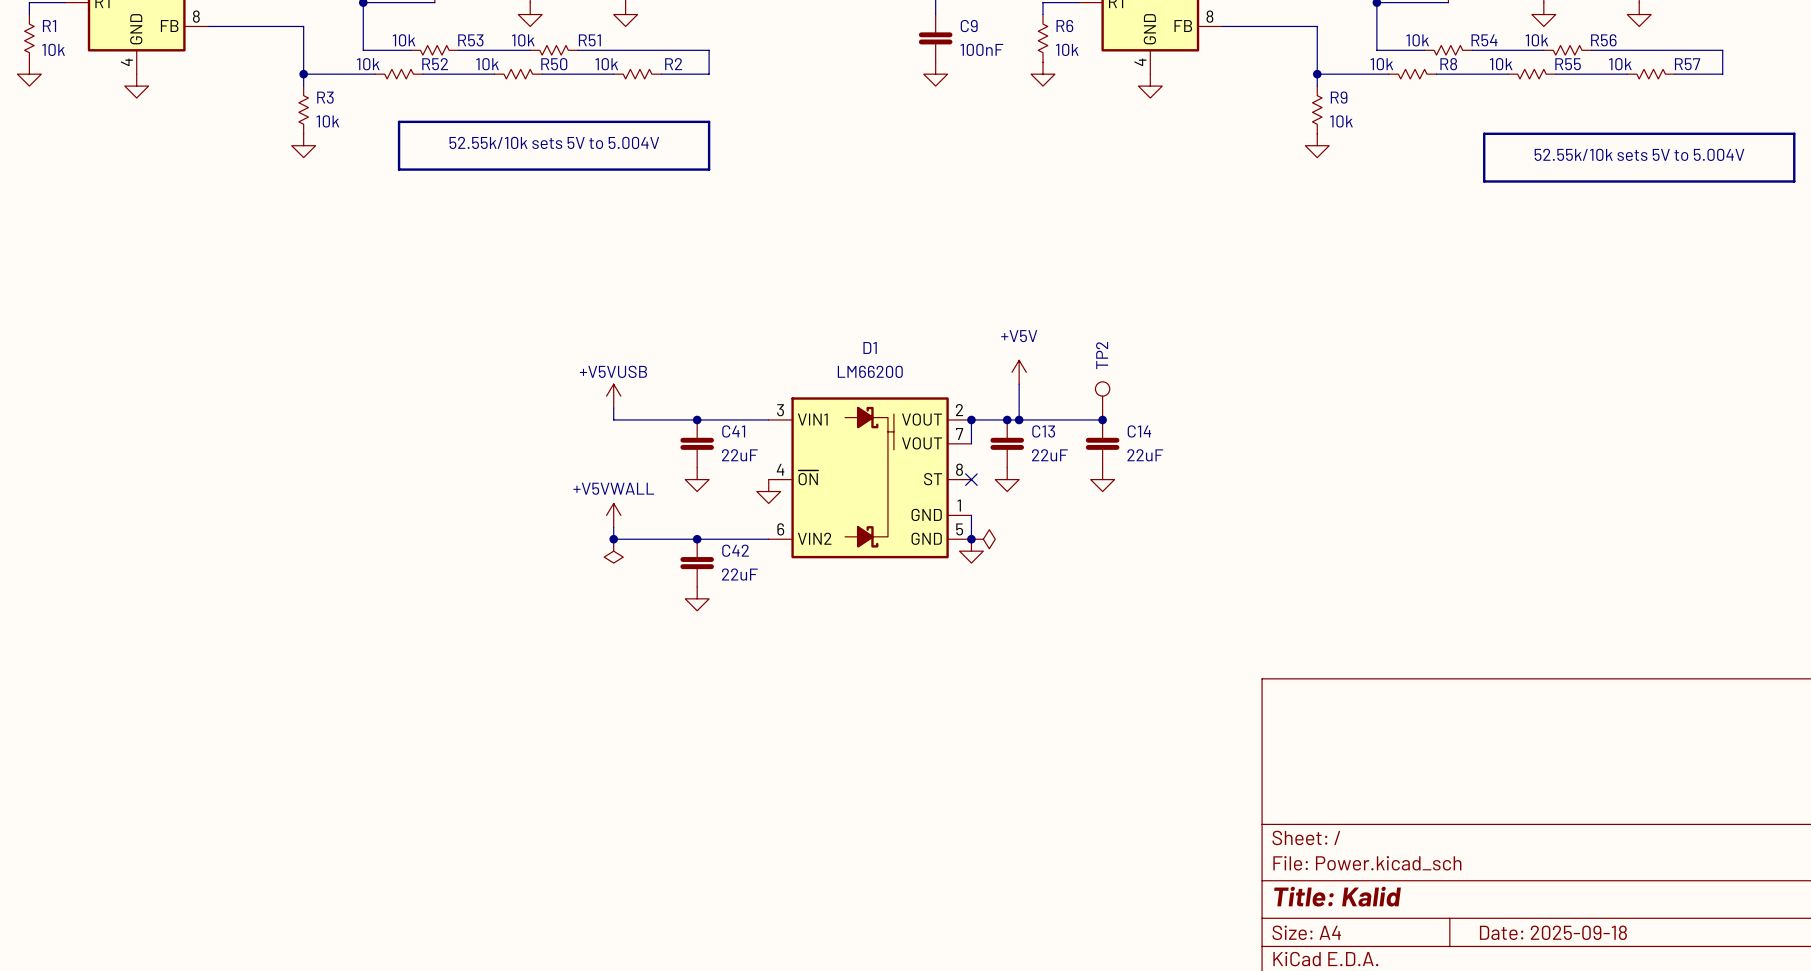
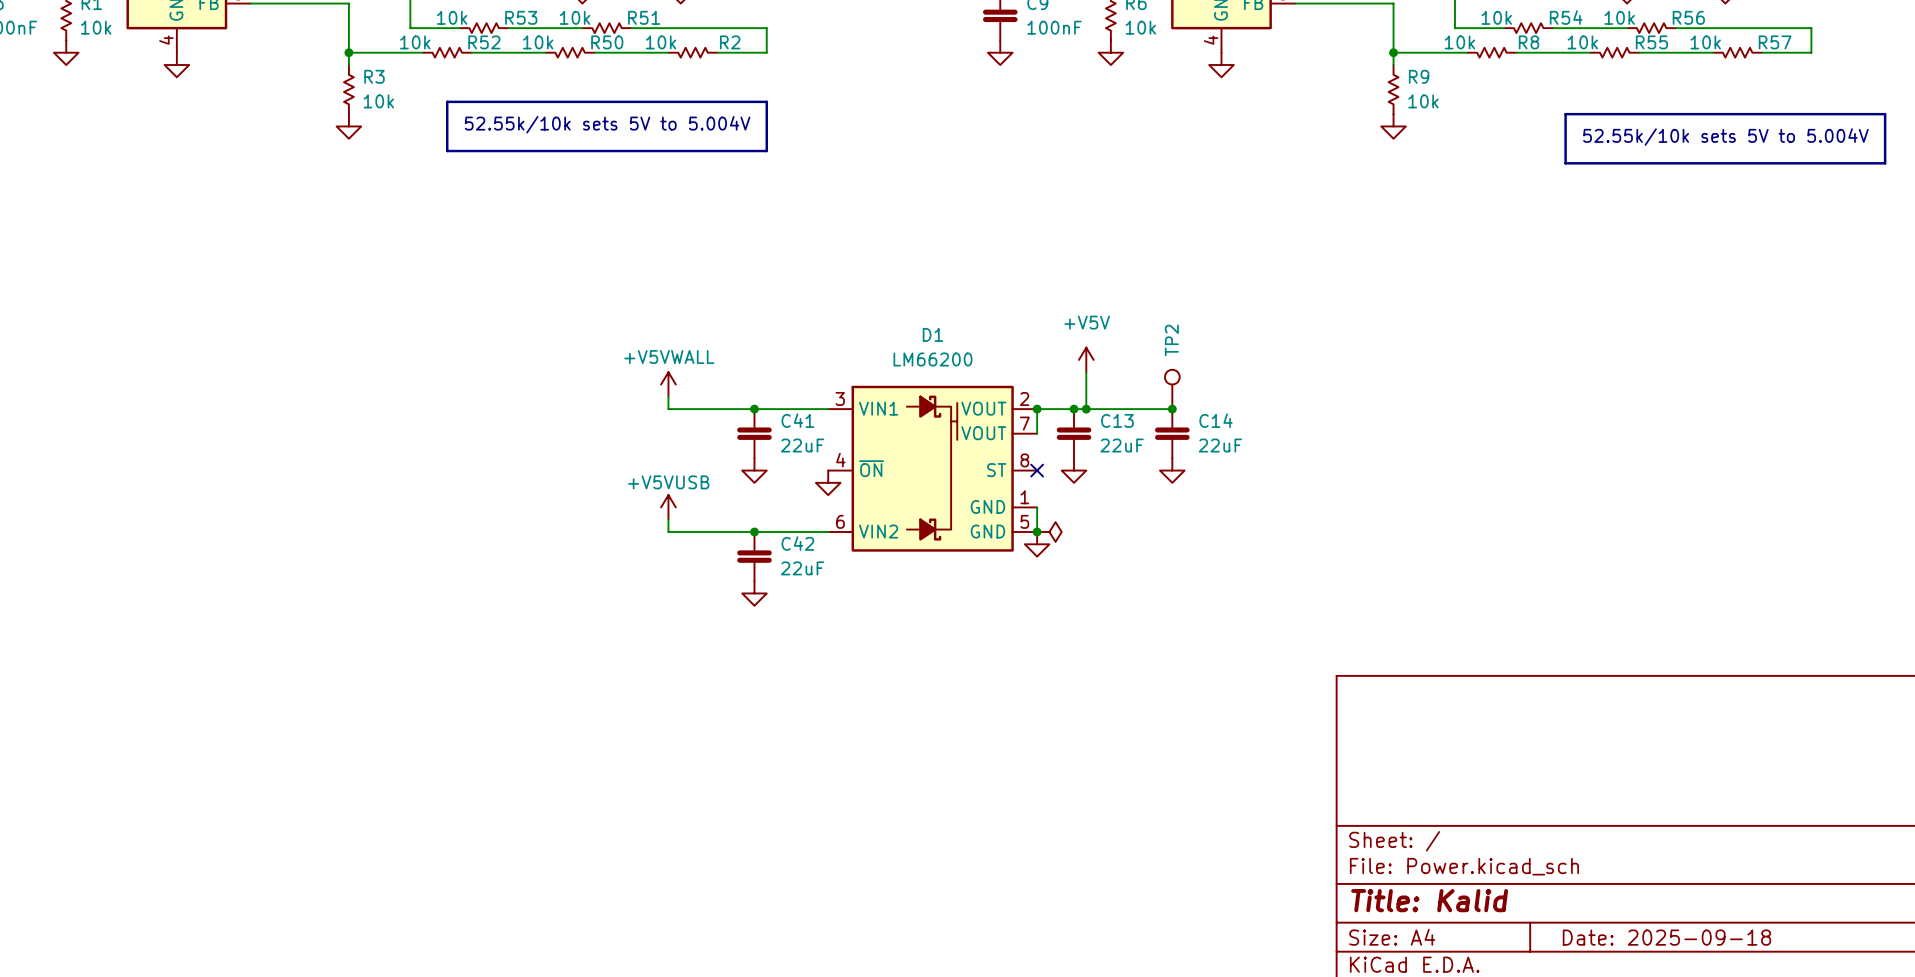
power symbol: +V5VUSB (613, 396) -> +V5VWALL (668, 384)
power symbol: +V5VWALL (613, 515) -> +V5VUSB (668, 507)
junction: (613, 539) -> none
power symbol: (613, 551) -> none

